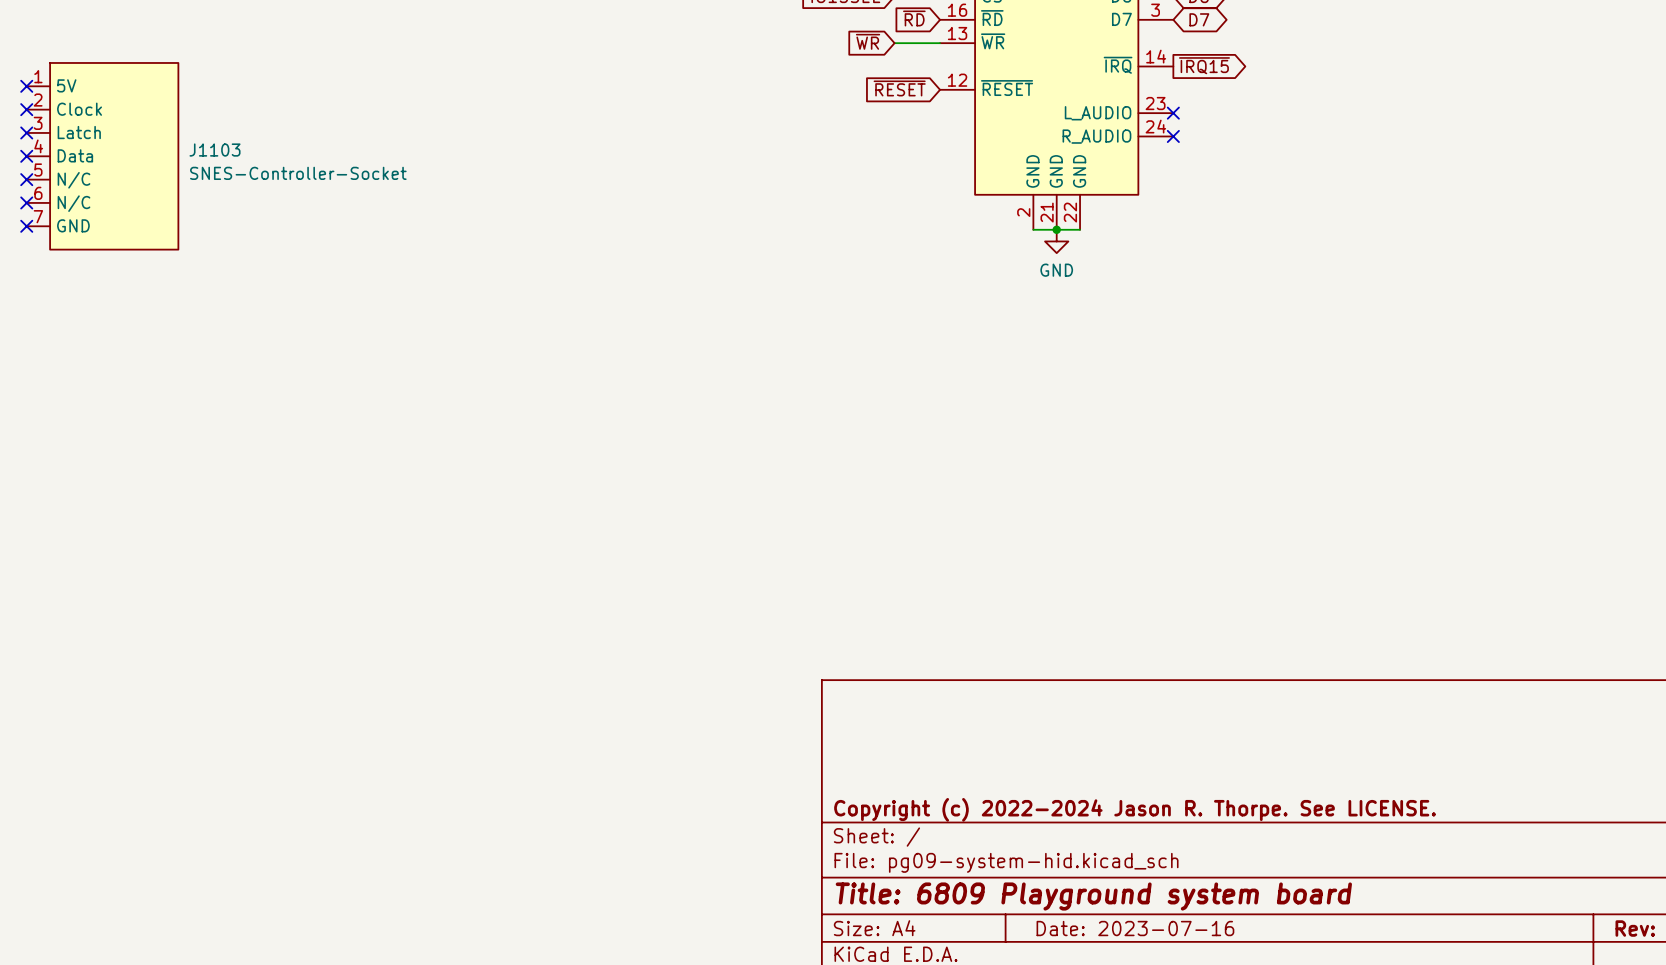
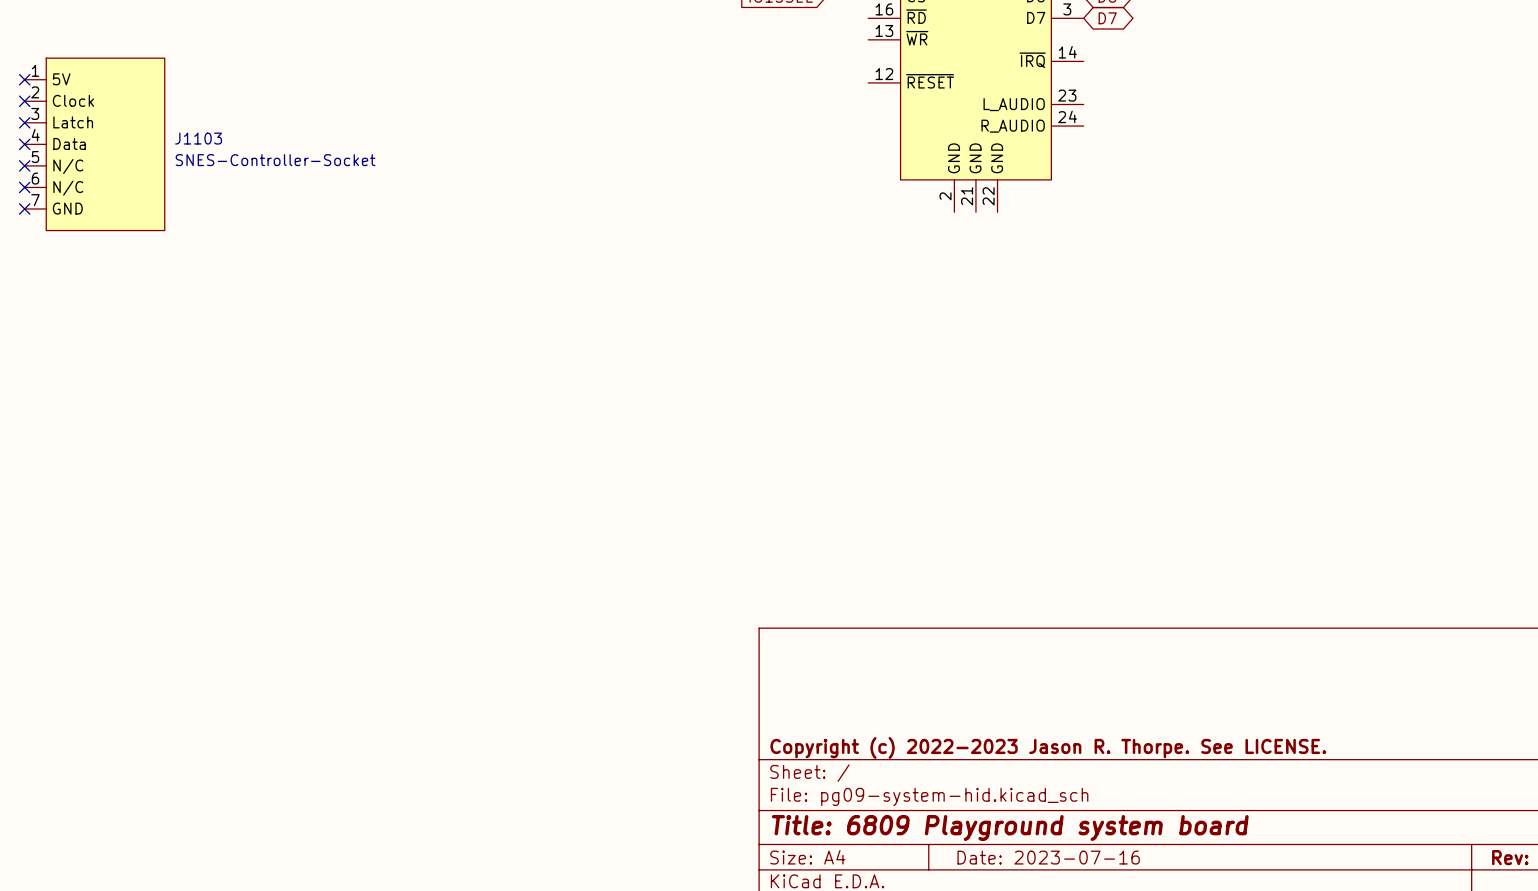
global label: ~{RD} (914, 18) -> none
global label: ~{WR} (868, 41) -> none
wire: (894, 43) (940, 43) -> none
global label: ~{IRQ15} (1204, 65) -> none
global label: ~{RESET} (899, 88) -> none
no-connect mark: (1173, 113) -> none
no-connect mark: (1173, 136) -> none
wire: (1033, 229) (1080, 229) -> none
junction: (1056, 229) -> none
power symbol: GND (1056, 241) -> none
title block: Copyright (c) 2022-2024 Jason R. Thorpe. See LICENSE. (1135, 809) -> Copyright (c) 2022-2023 Jason R. Thorpe. See LICENSE. (1048, 747)

